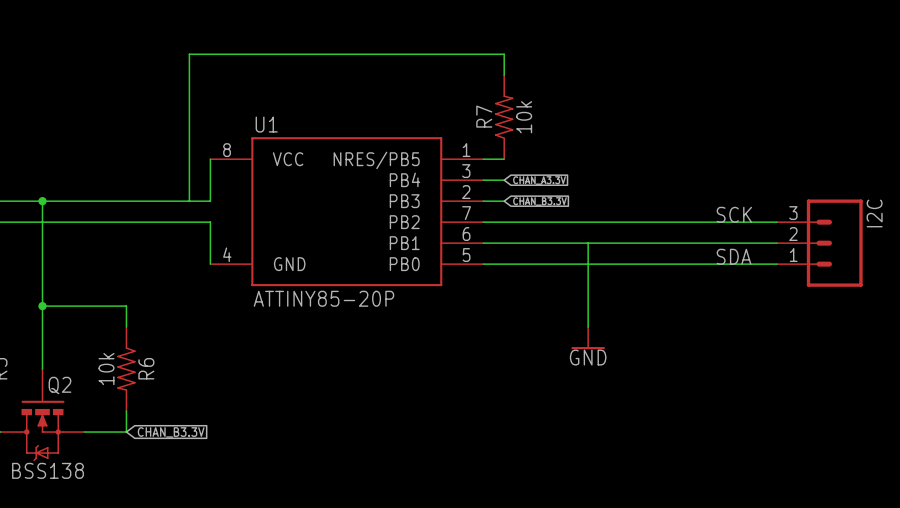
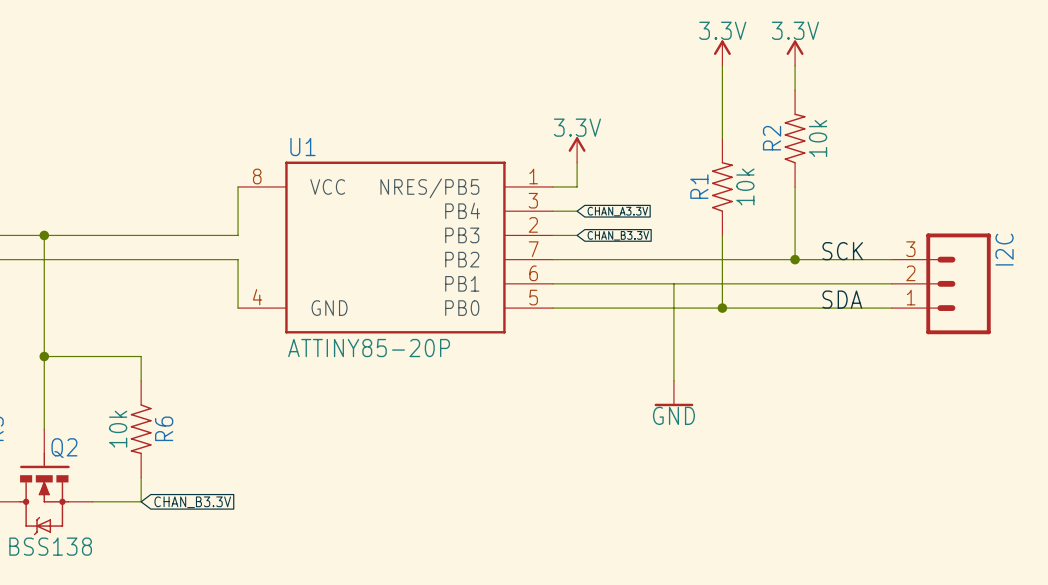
power symbol: none -> 3.3V (722, 53)
power symbol: none -> 3.3V (795, 53)
wire: none -> (722, 65) (722, 138)
wire: none -> (795, 65) (795, 90)
wire: (504, 75) (504, 54) (189, 54) (189, 201) -> none
R7: 10k (504, 117) -> none
R2: none -> 10k (795, 138)
power symbol: none -> 3.3V (577, 150)
R1: none -> 10k (722, 186)
wire: none -> (795, 186) (795, 259)
wire: none -> (722, 235) (722, 308)
junction: none -> (795, 259)
junction: none -> (722, 308)

